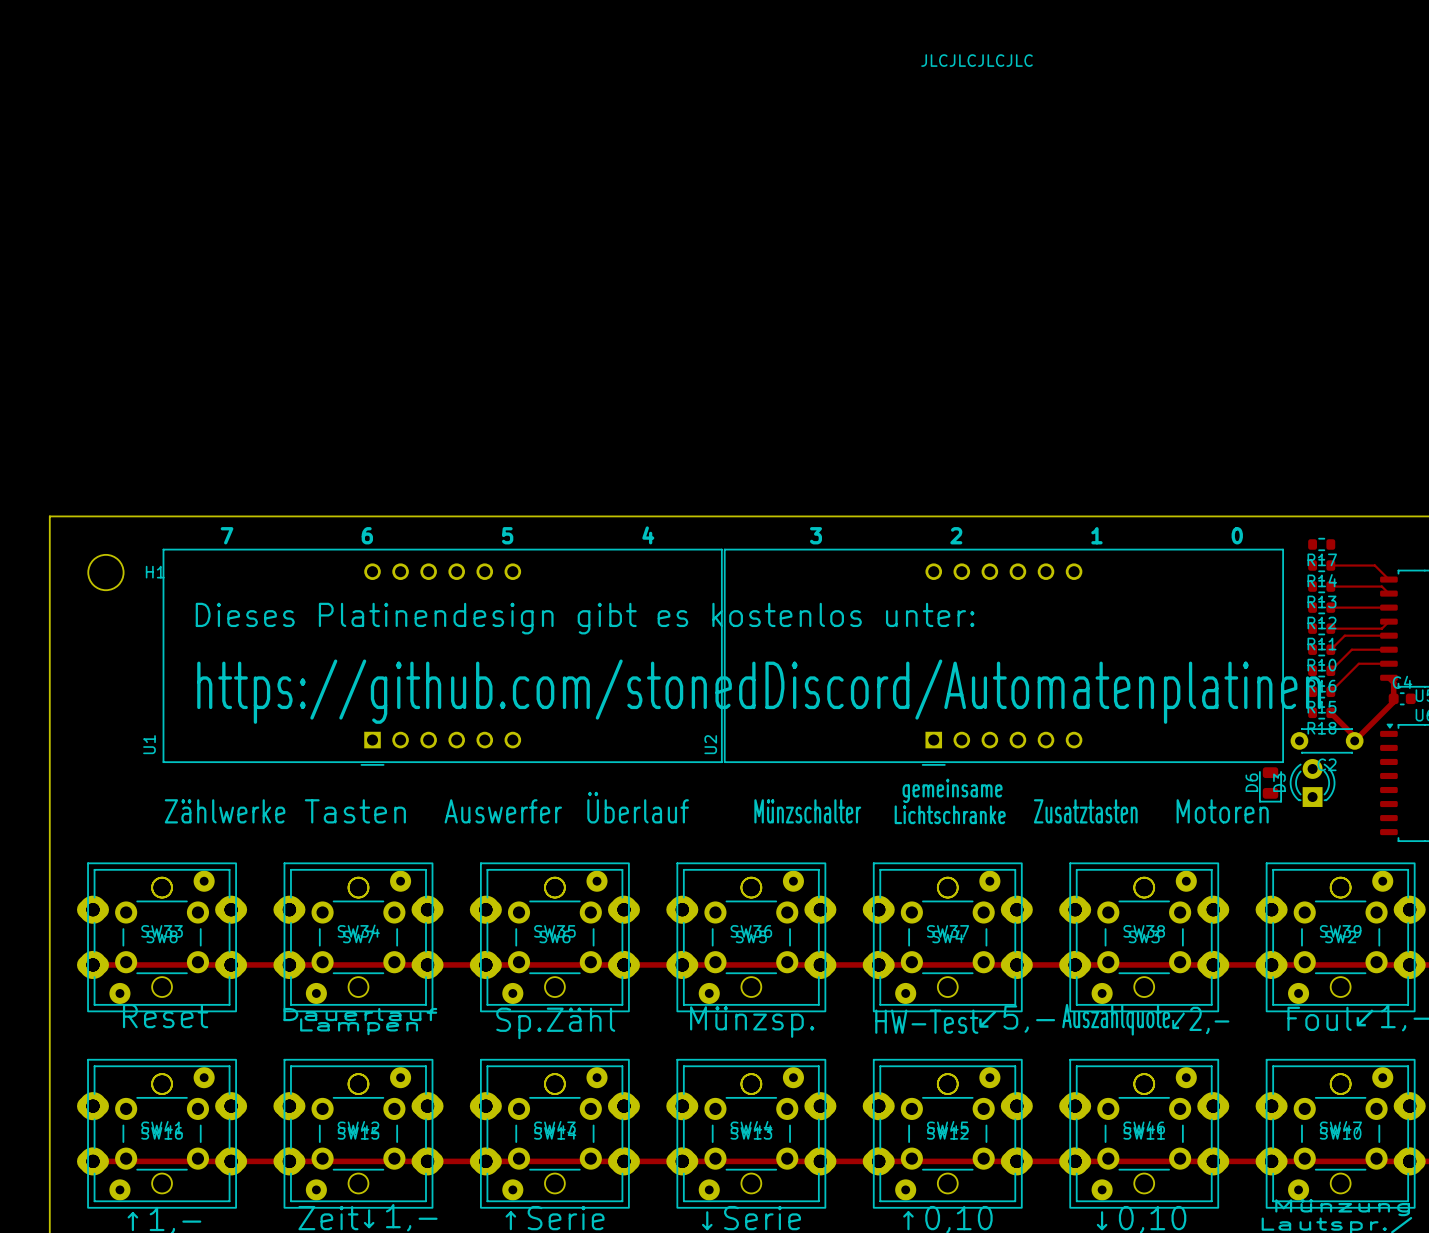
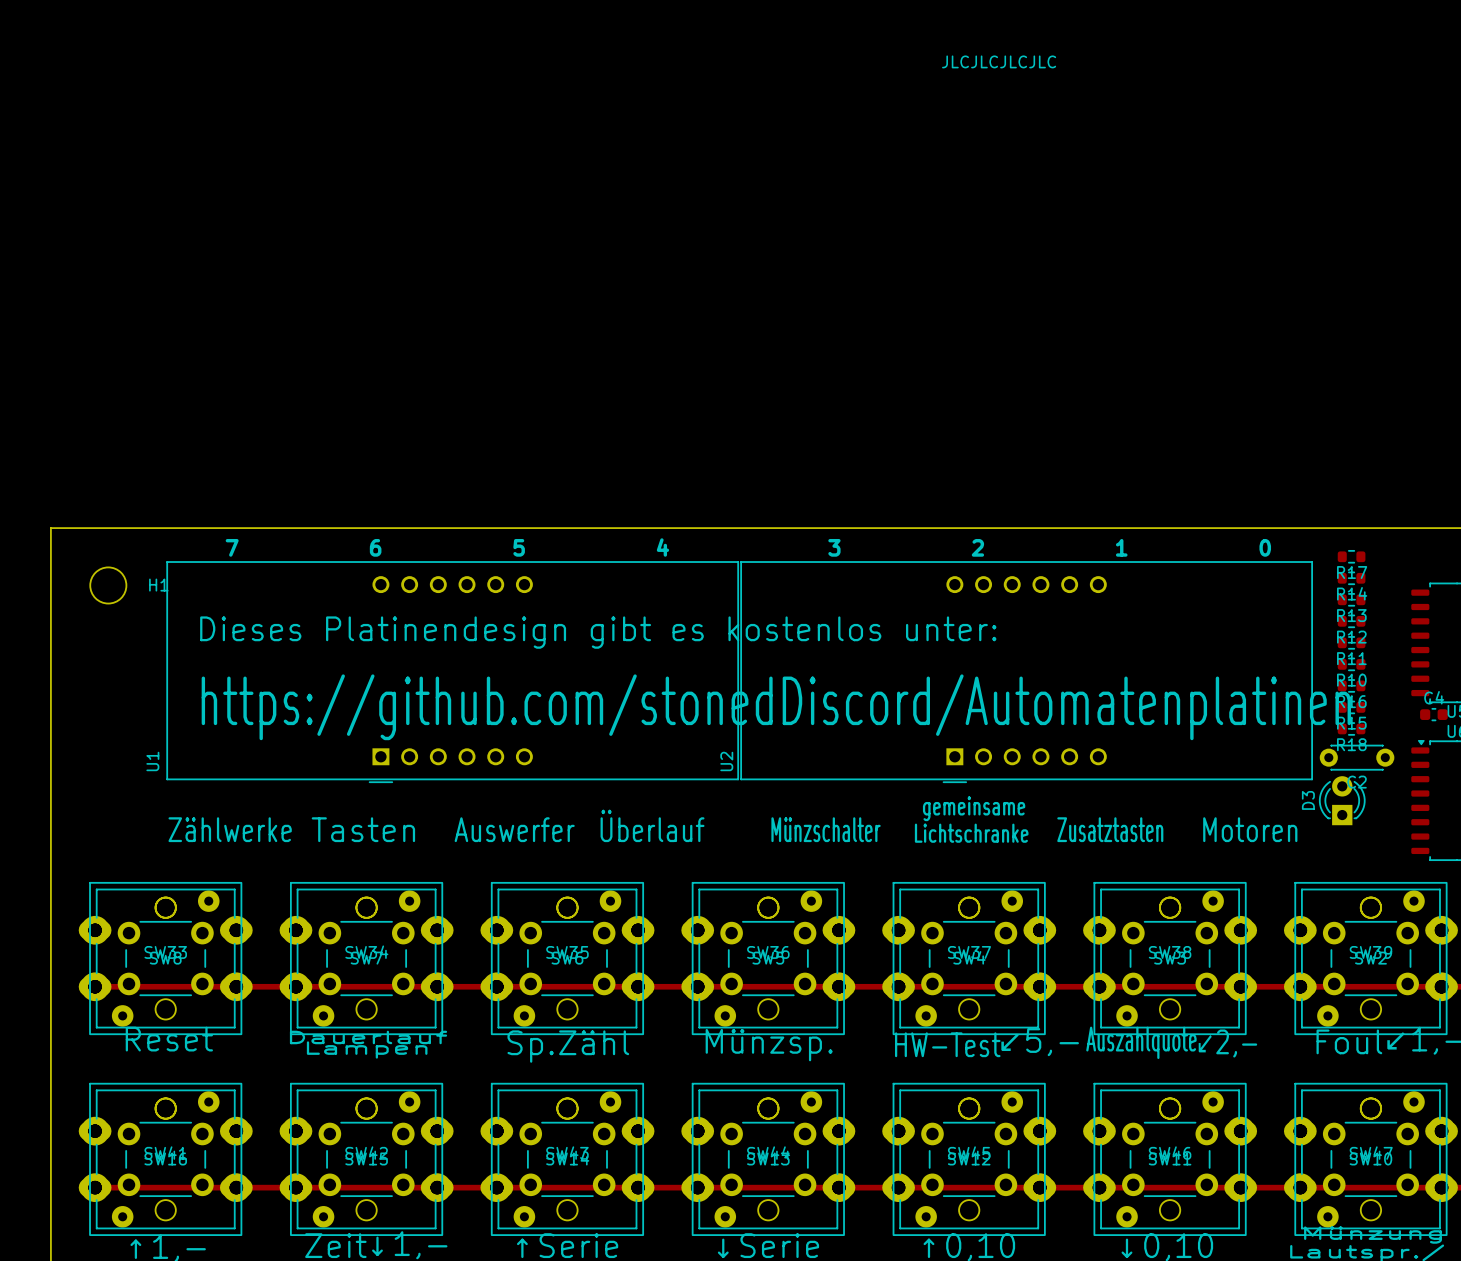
track: (1330, 565) (1374, 565) (1388, 579) -> none
track: (1330, 586) (1381, 586) (1388, 593) -> none
track: (1330, 607) (1388, 607) -> none
track: (1388, 621) (1381, 628) (1330, 628) -> none
track: (1388, 635) (1344, 635) (1330, 649) -> none
track: (1388, 649) (1351, 649) (1330, 670) -> none
track: (1388, 663) (1358, 663) (1330, 691) -> none
track: (1388, 677) (1393, 682) (1393, 701) (1354, 740) (1354, 736) (1330, 712) -> none
D6: (1270, 784) -> none

